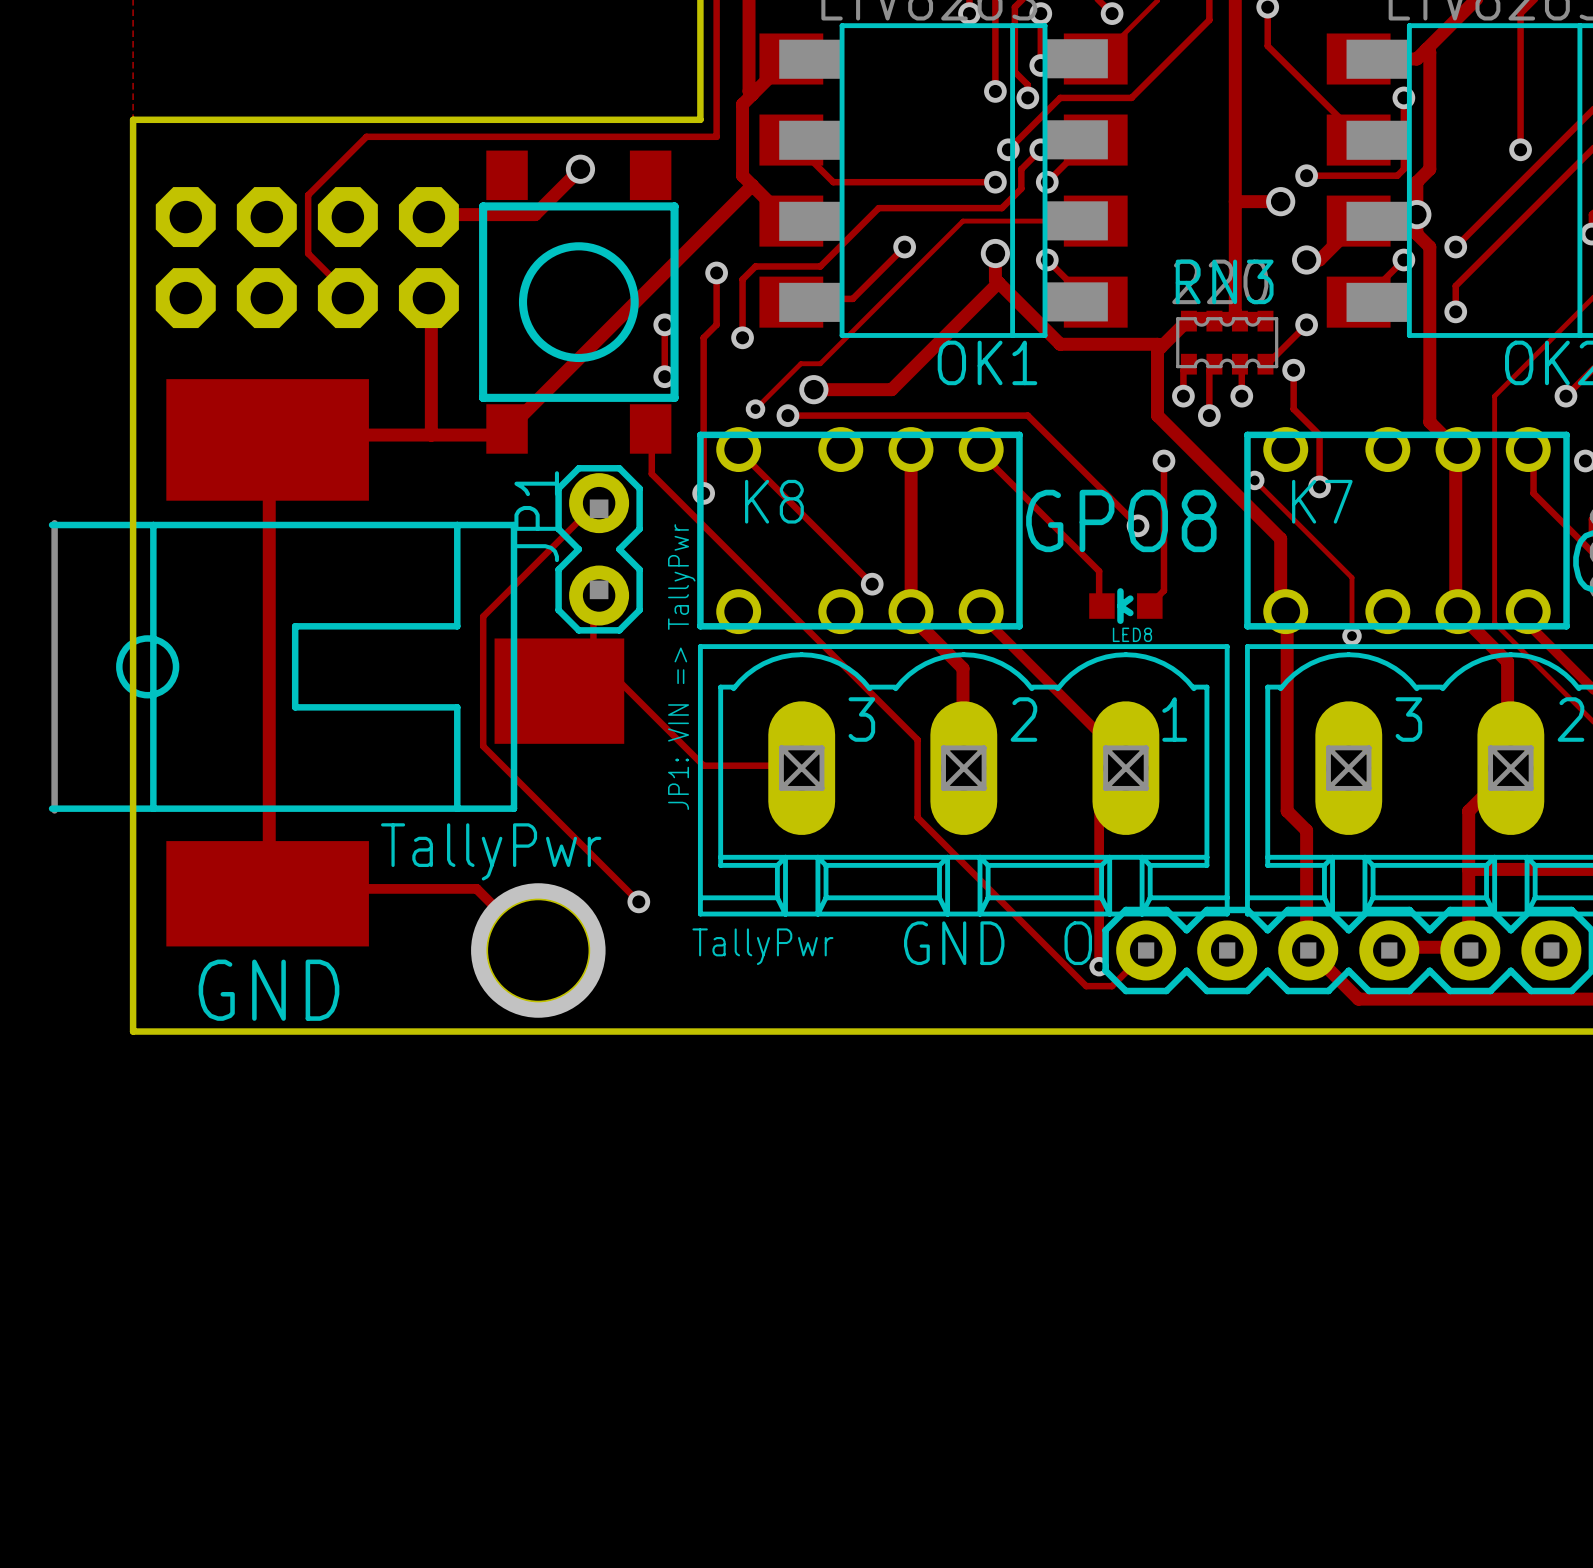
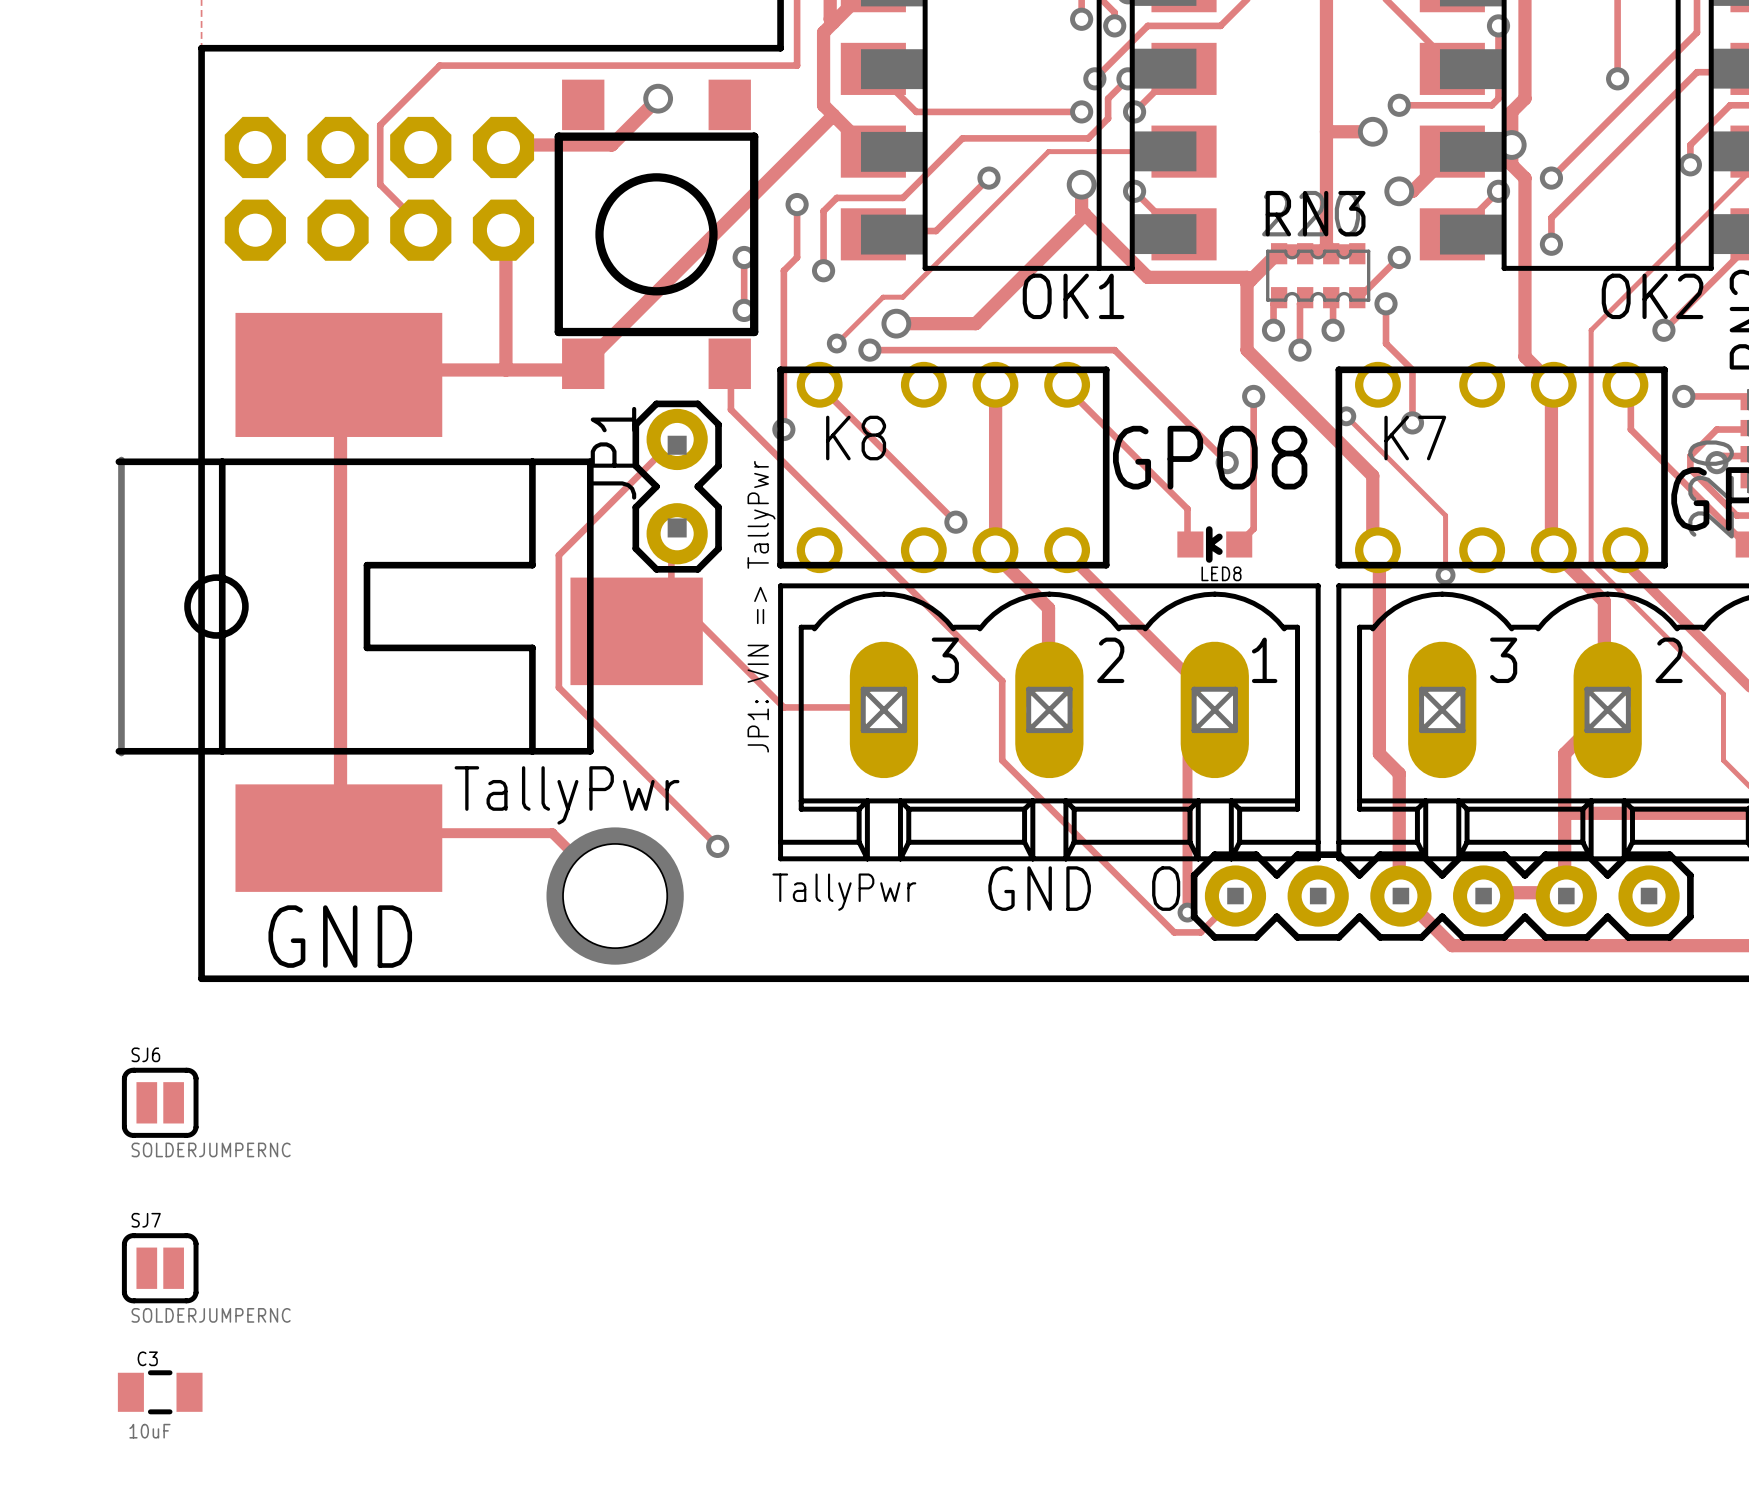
SJ6: none -> SOLDERJUMPERNC (160, 1102)
SJ7: none -> SOLDERJUMPERNC (160, 1268)
C3: none -> 10uF (160, 1392)

